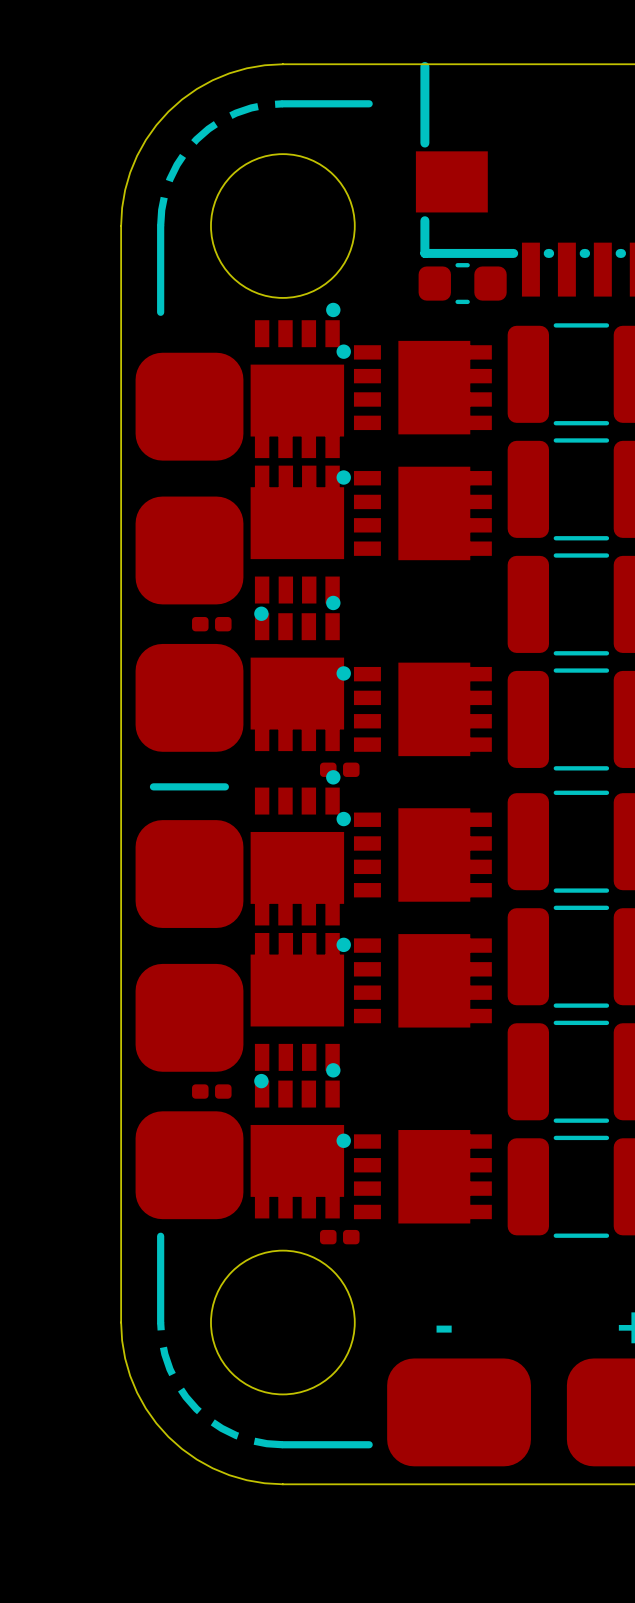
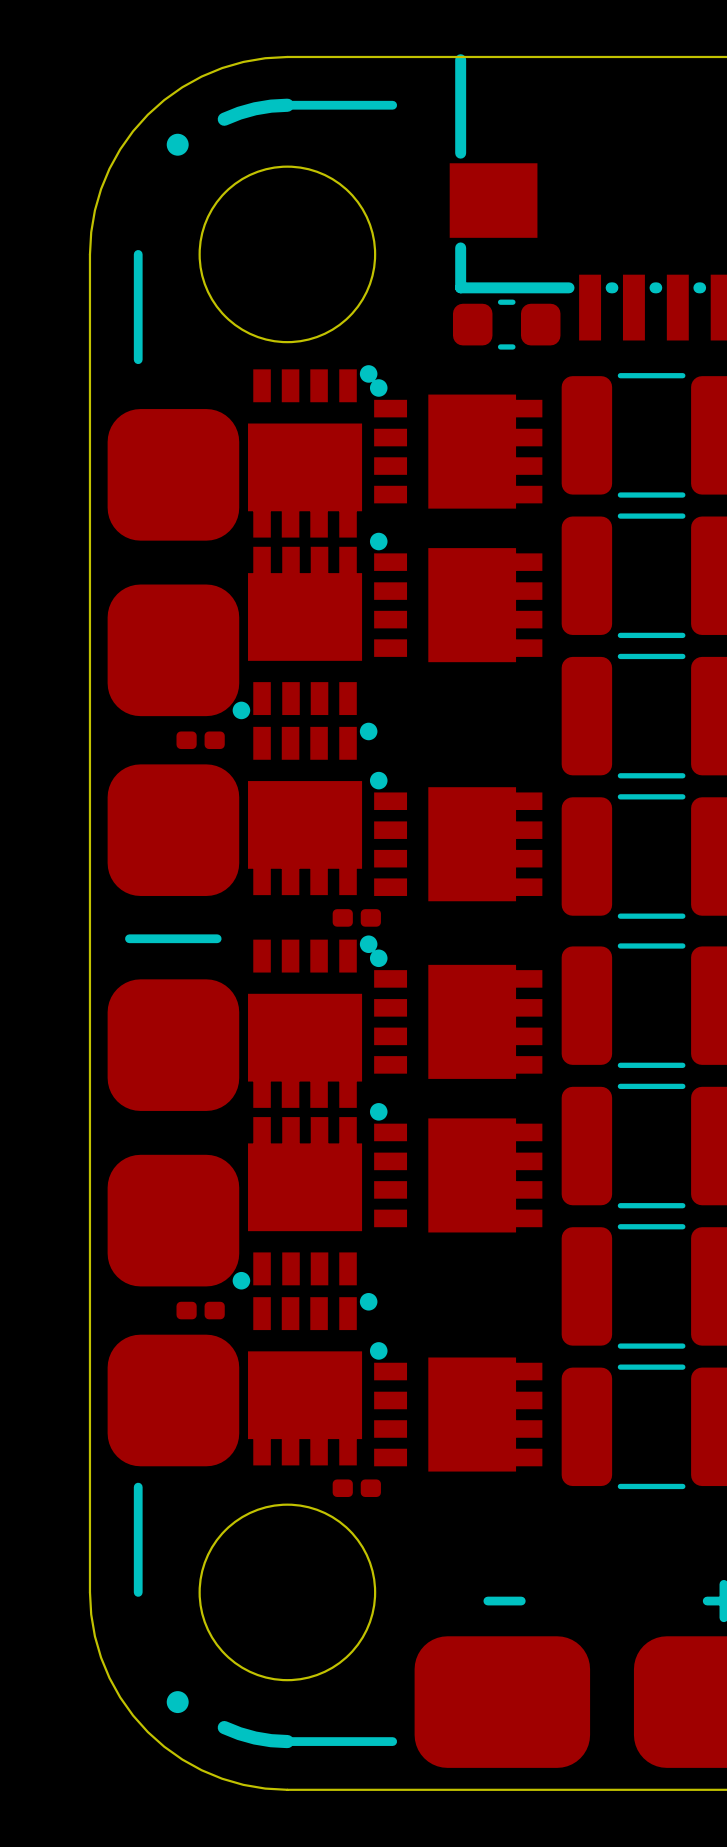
line: (282, 103) (251, 107) (236, 113) (208, 129) (196, 139) (177, 164) (169, 179) (164, 194) (160, 226) -> (287, 105) (255, 108) (224, 119)
drawing: none -> [166, 133, 189, 156]
part footprint: [250, 302, 345, 459] -> [248, 365, 378, 538]
part footprint: [336, 340, 492, 435] -> [369, 379, 543, 509]
part footprint: [250, 465, 345, 621] -> [232, 546, 363, 720]
part footprint: [336, 466, 492, 561] -> [369, 532, 543, 663]
part footprint: [250, 595, 345, 752] -> [248, 722, 378, 896]
part footprint: [336, 662, 492, 757] -> [369, 771, 543, 902]
part footprint: [250, 770, 345, 926] -> [248, 935, 378, 1108]
part footprint: [336, 808, 492, 902] -> [369, 949, 543, 1079]
part footprint: [250, 932, 345, 1089] -> [232, 1117, 363, 1290]
part footprint: [336, 934, 492, 1028] -> [369, 1103, 543, 1233]
part footprint: [250, 1063, 345, 1219] -> [248, 1293, 378, 1466]
part footprint: [336, 1130, 492, 1224] -> [369, 1342, 543, 1472]
line: (160, 1322) (161, 1338) (169, 1369) (177, 1383) (196, 1408) (221, 1428) (236, 1435) (266, 1443) (282, 1444) -> (224, 1727) (255, 1738) (287, 1741)
drawing: none -> [166, 1691, 189, 1714]

